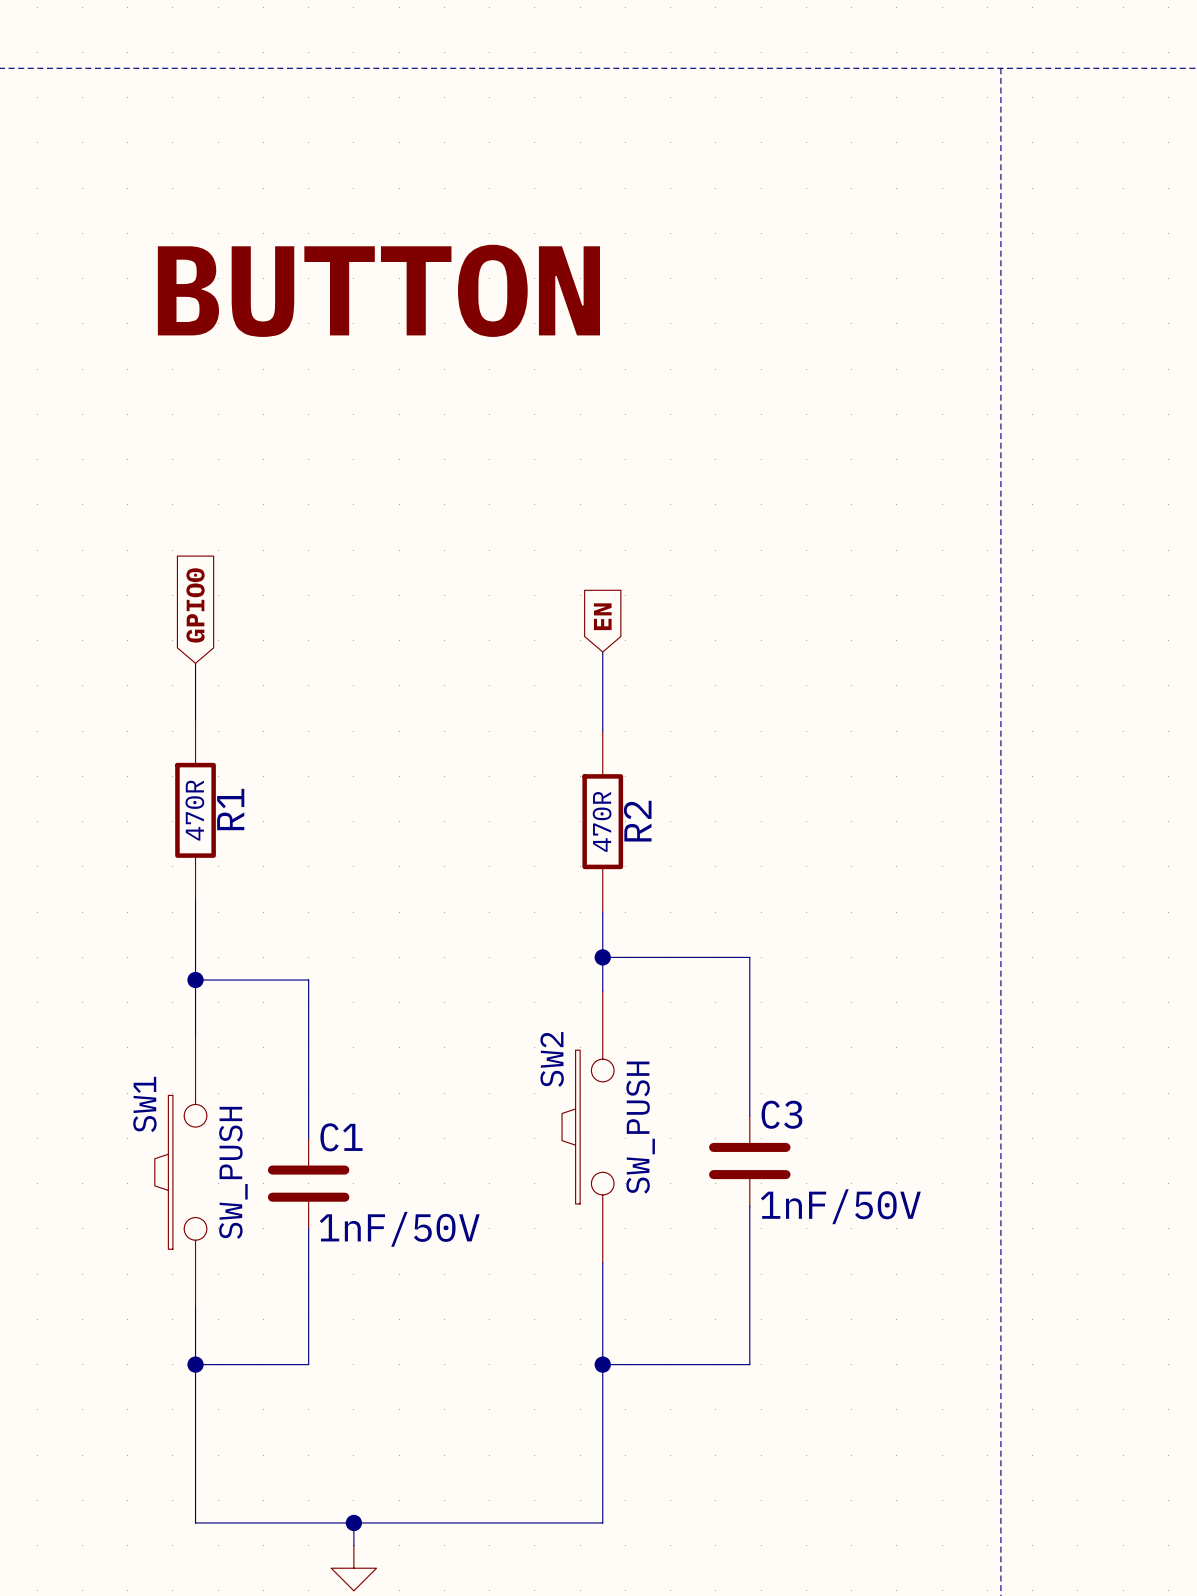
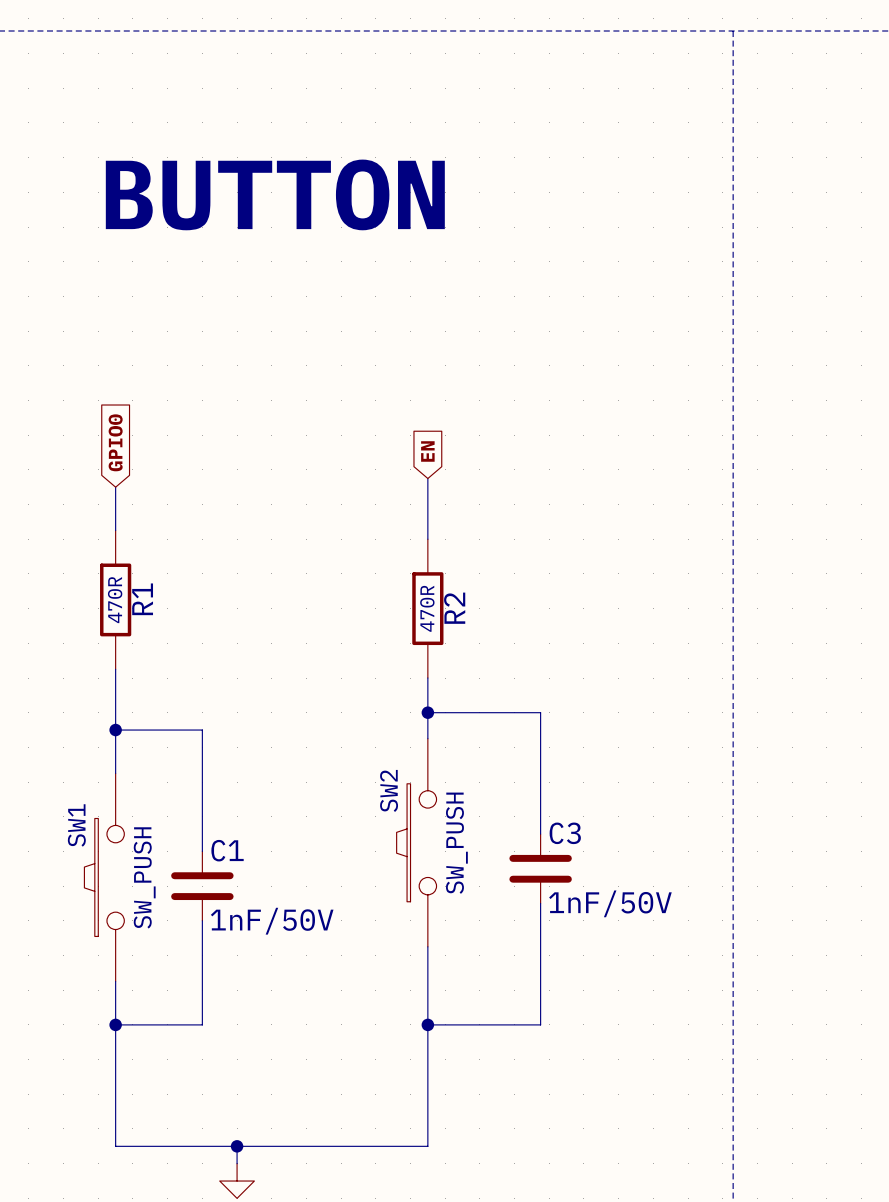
text: none -> BUTTON (275, 194)
label: BUTTON (378, 290) -> none

